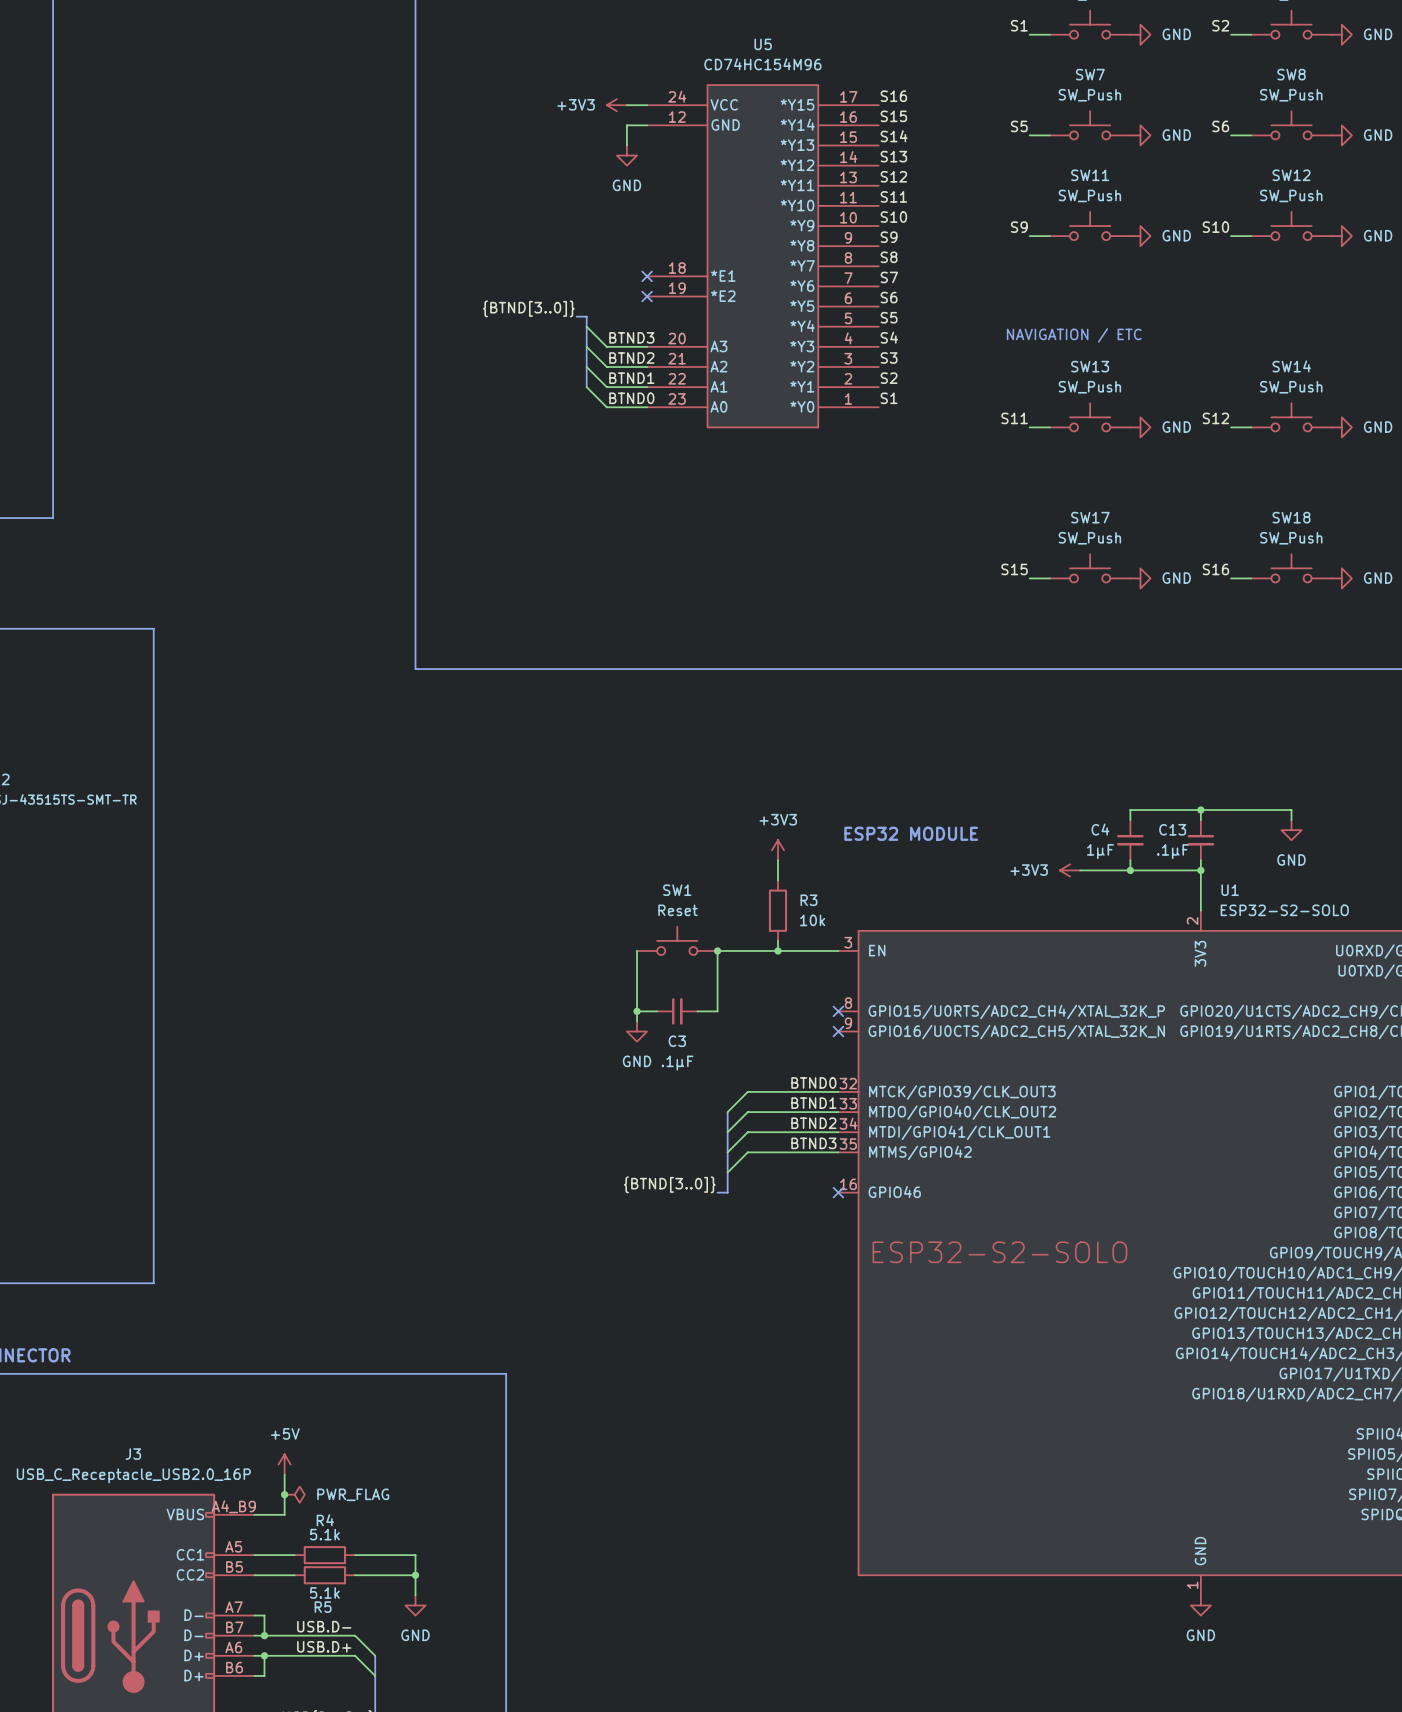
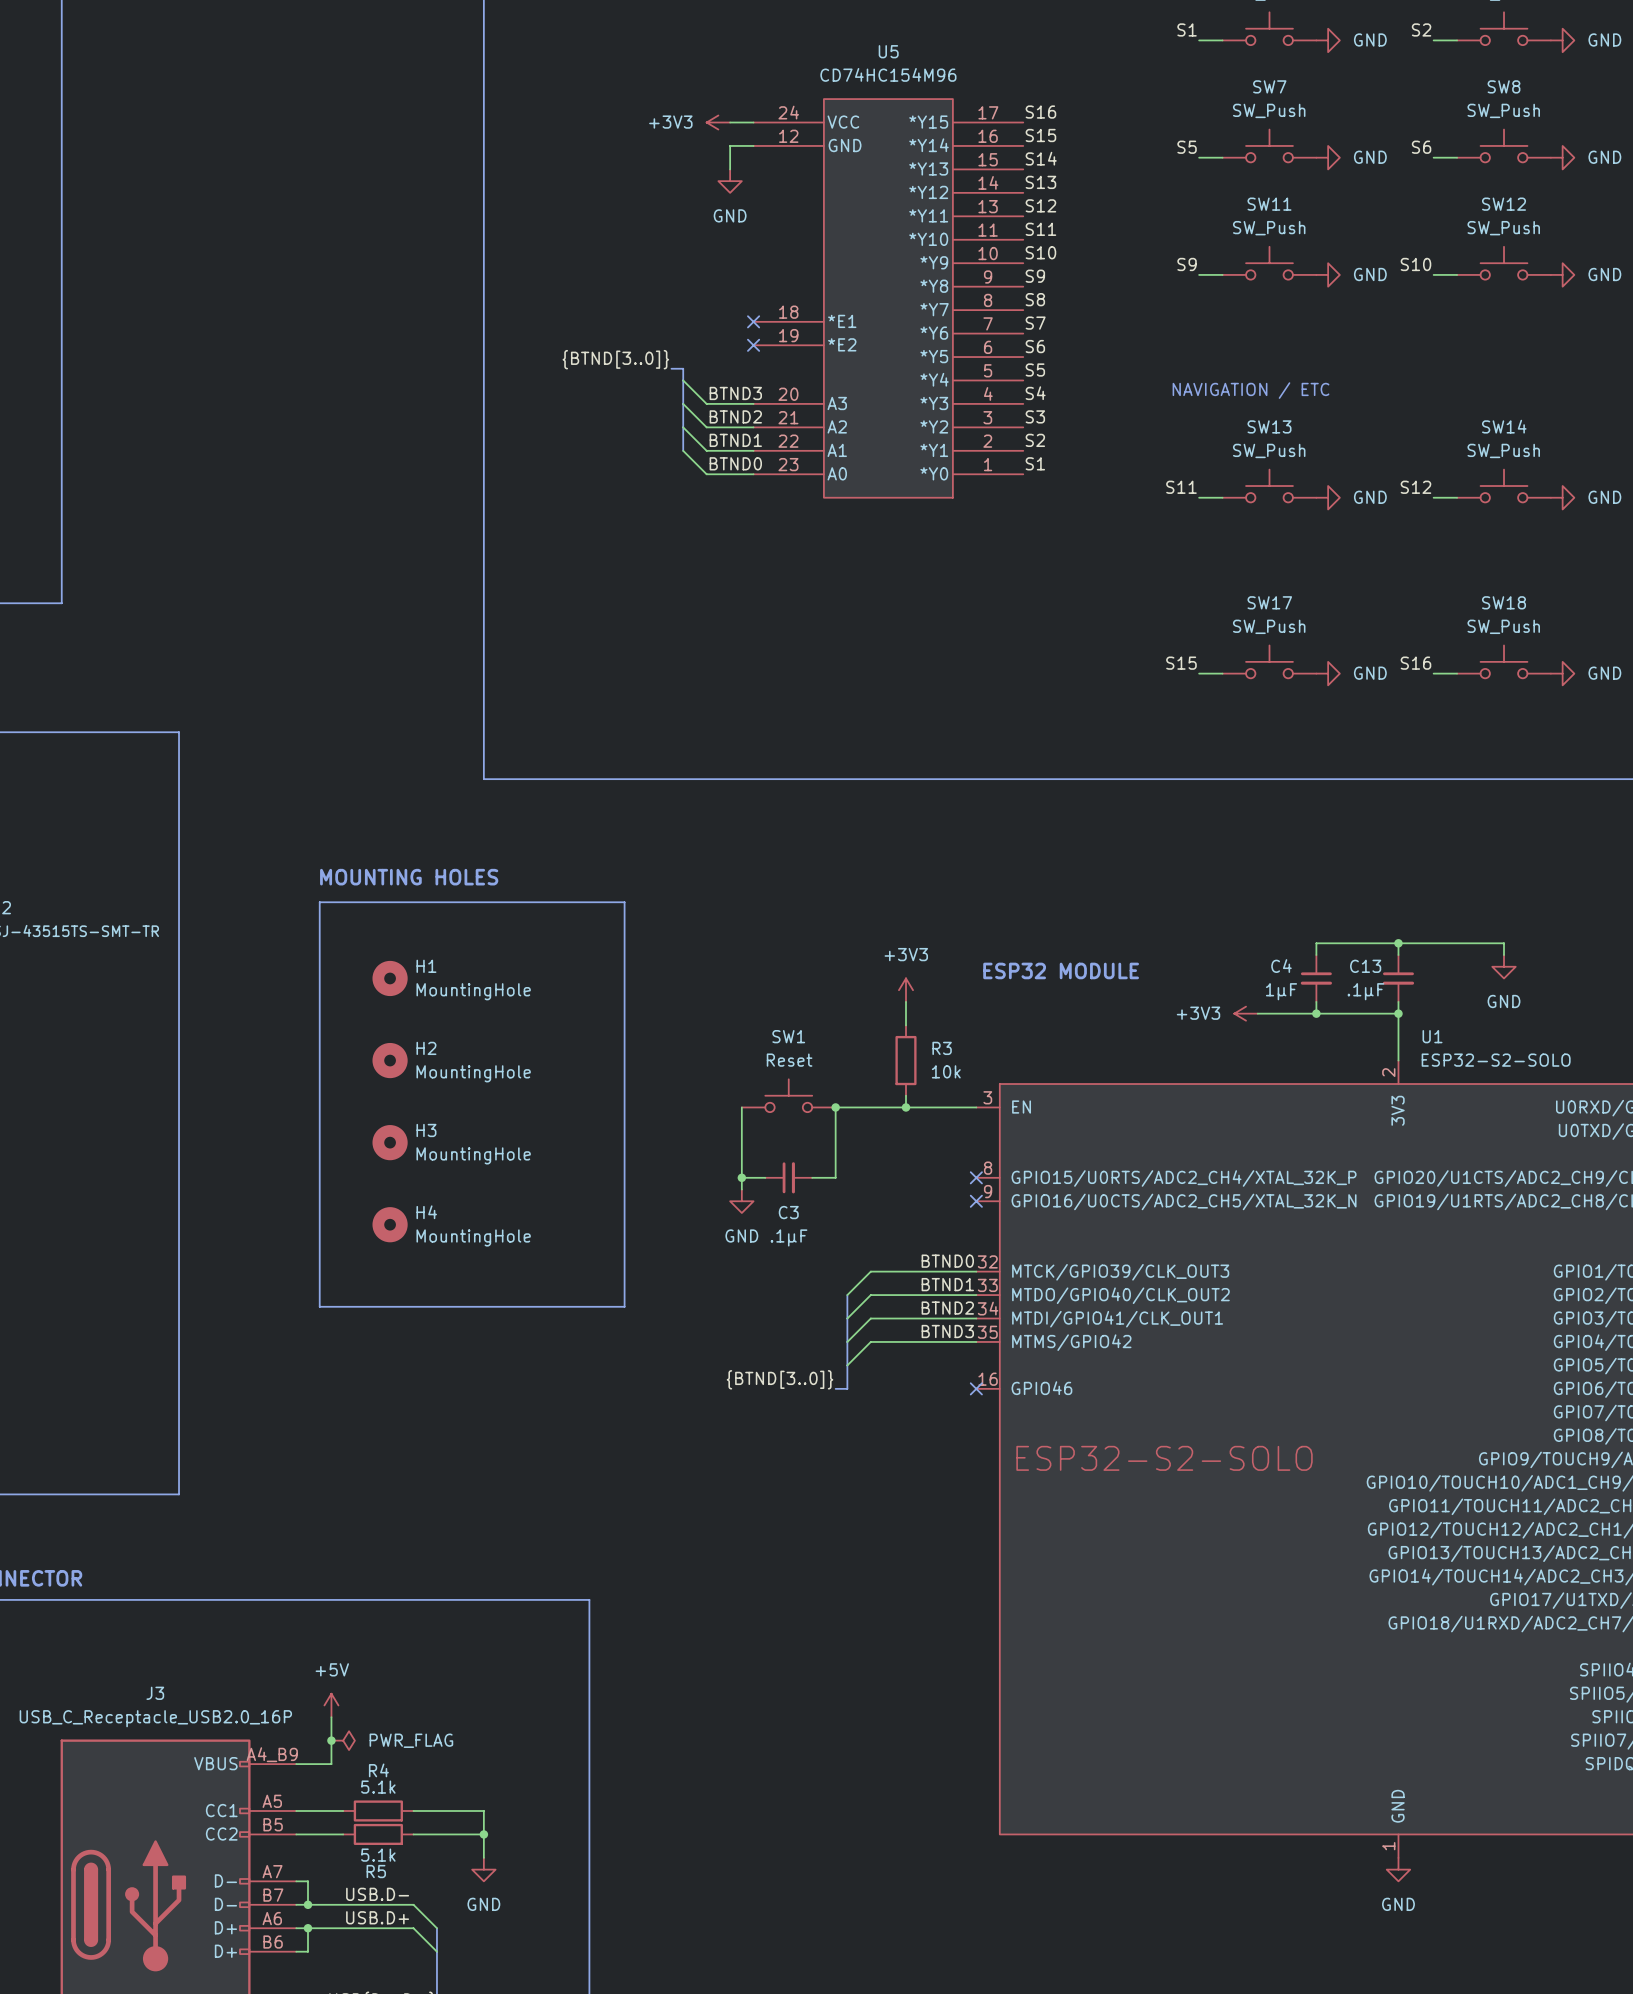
text: none -> MOUNTING HOLES (409, 877)
line: none -> (319, 902) (624, 902) (624, 1306) (319, 1306) (319, 902)
H1: none -> MountingHole (390, 978)
H2: none -> MountingHole (390, 1060)
H3: none -> MountingHole (390, 1142)
H4: none -> MountingHole (390, 1224)

